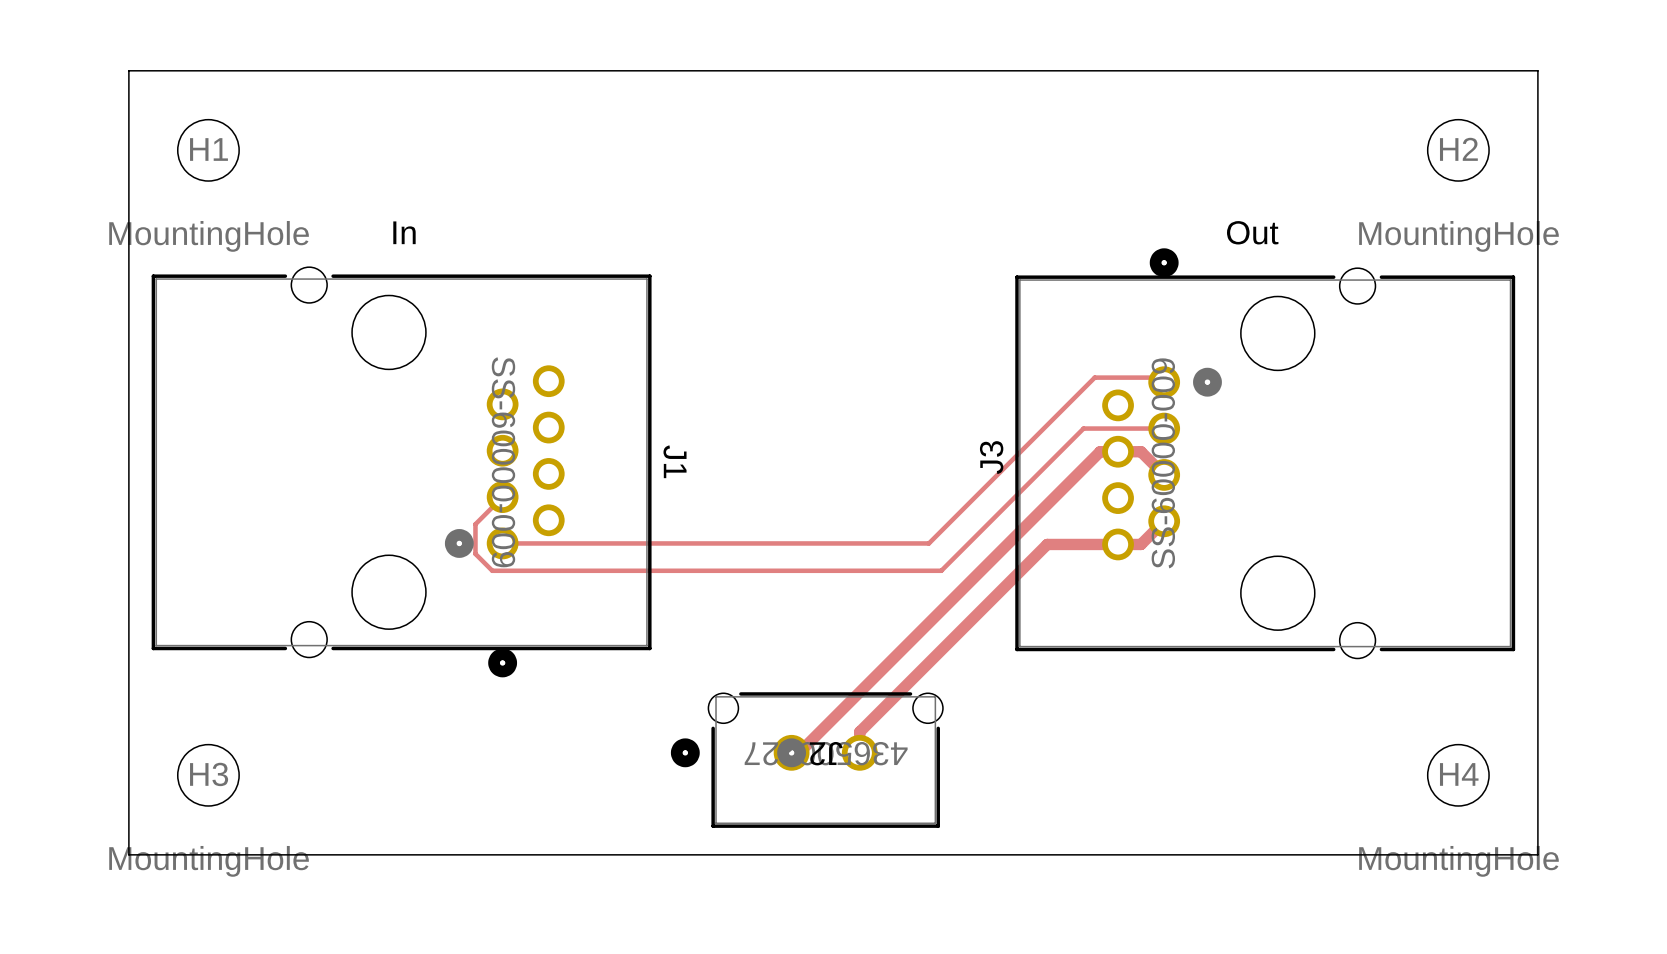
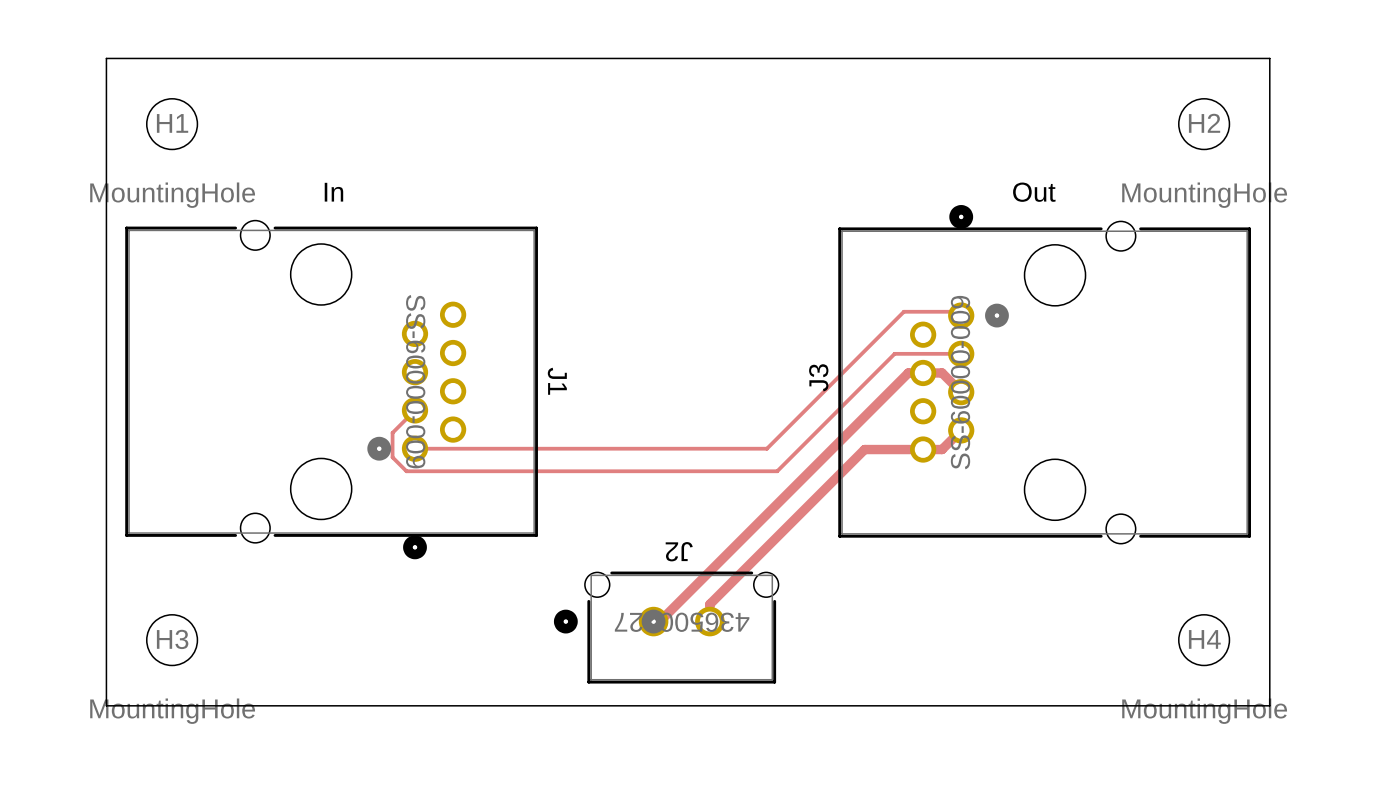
J2 name position: J2 (826, 753) -> J2 (679, 551)

